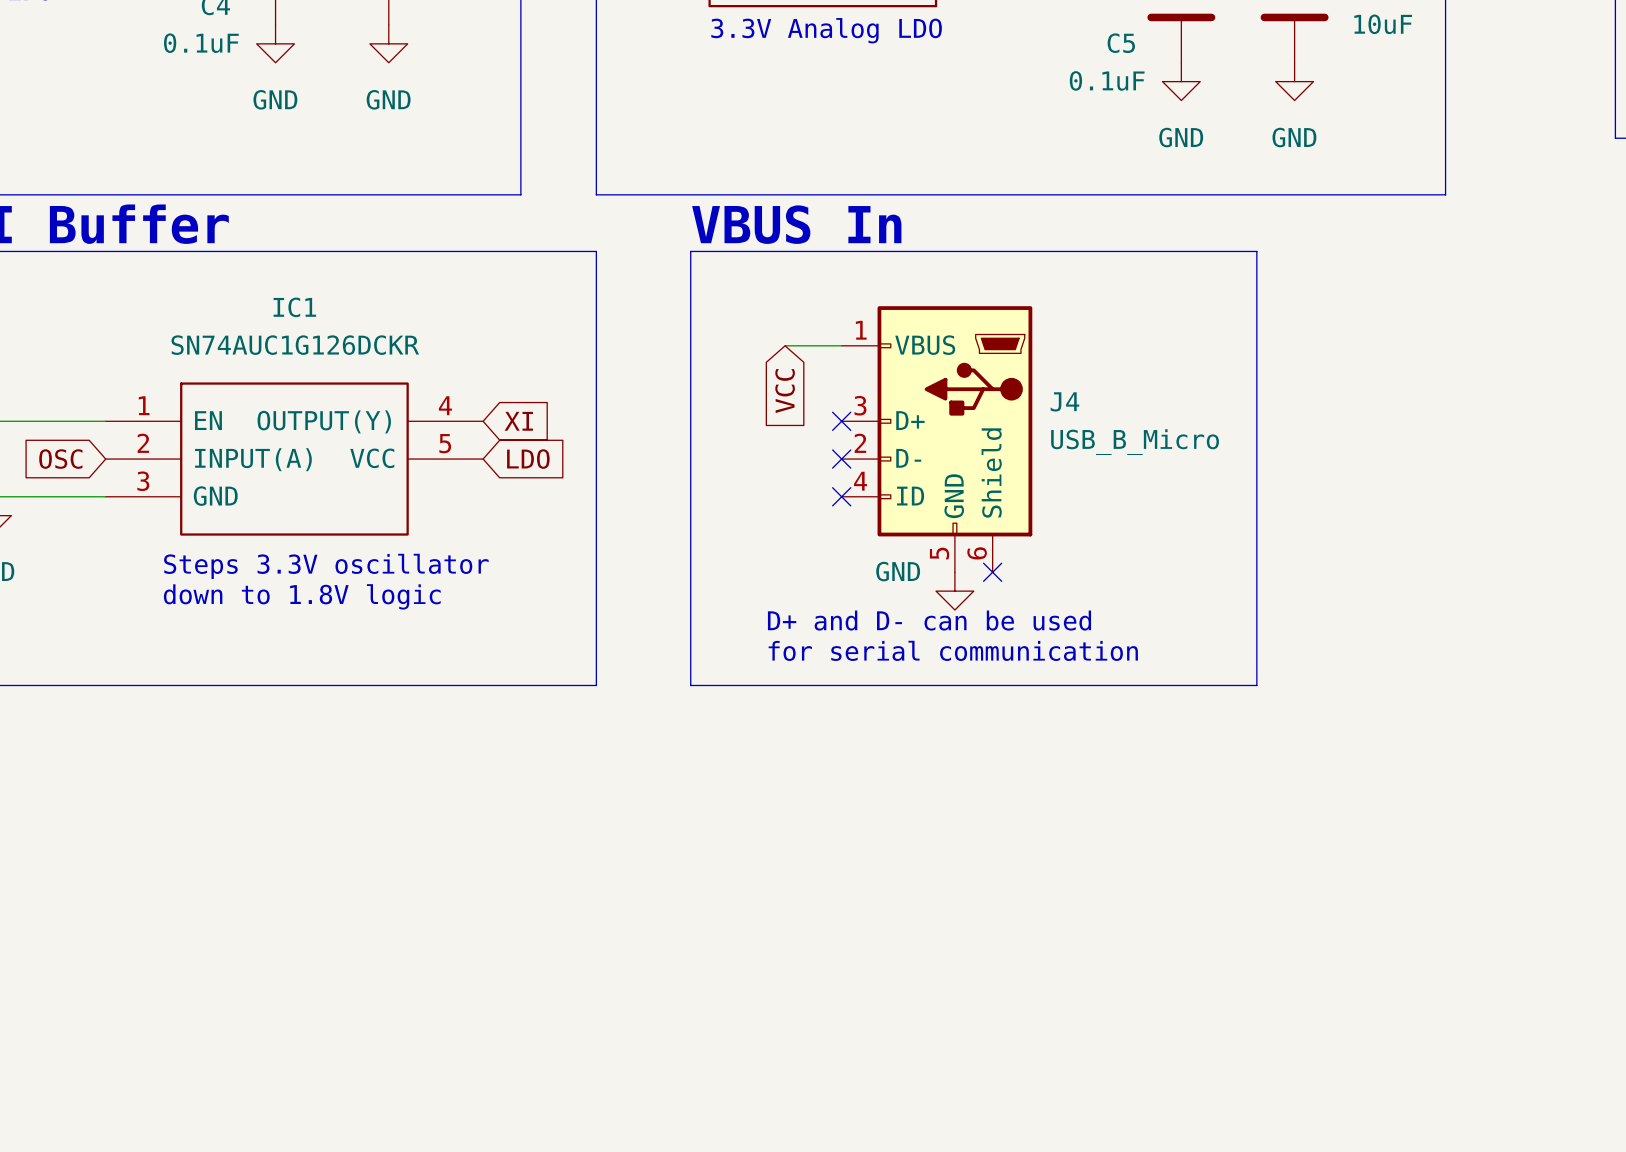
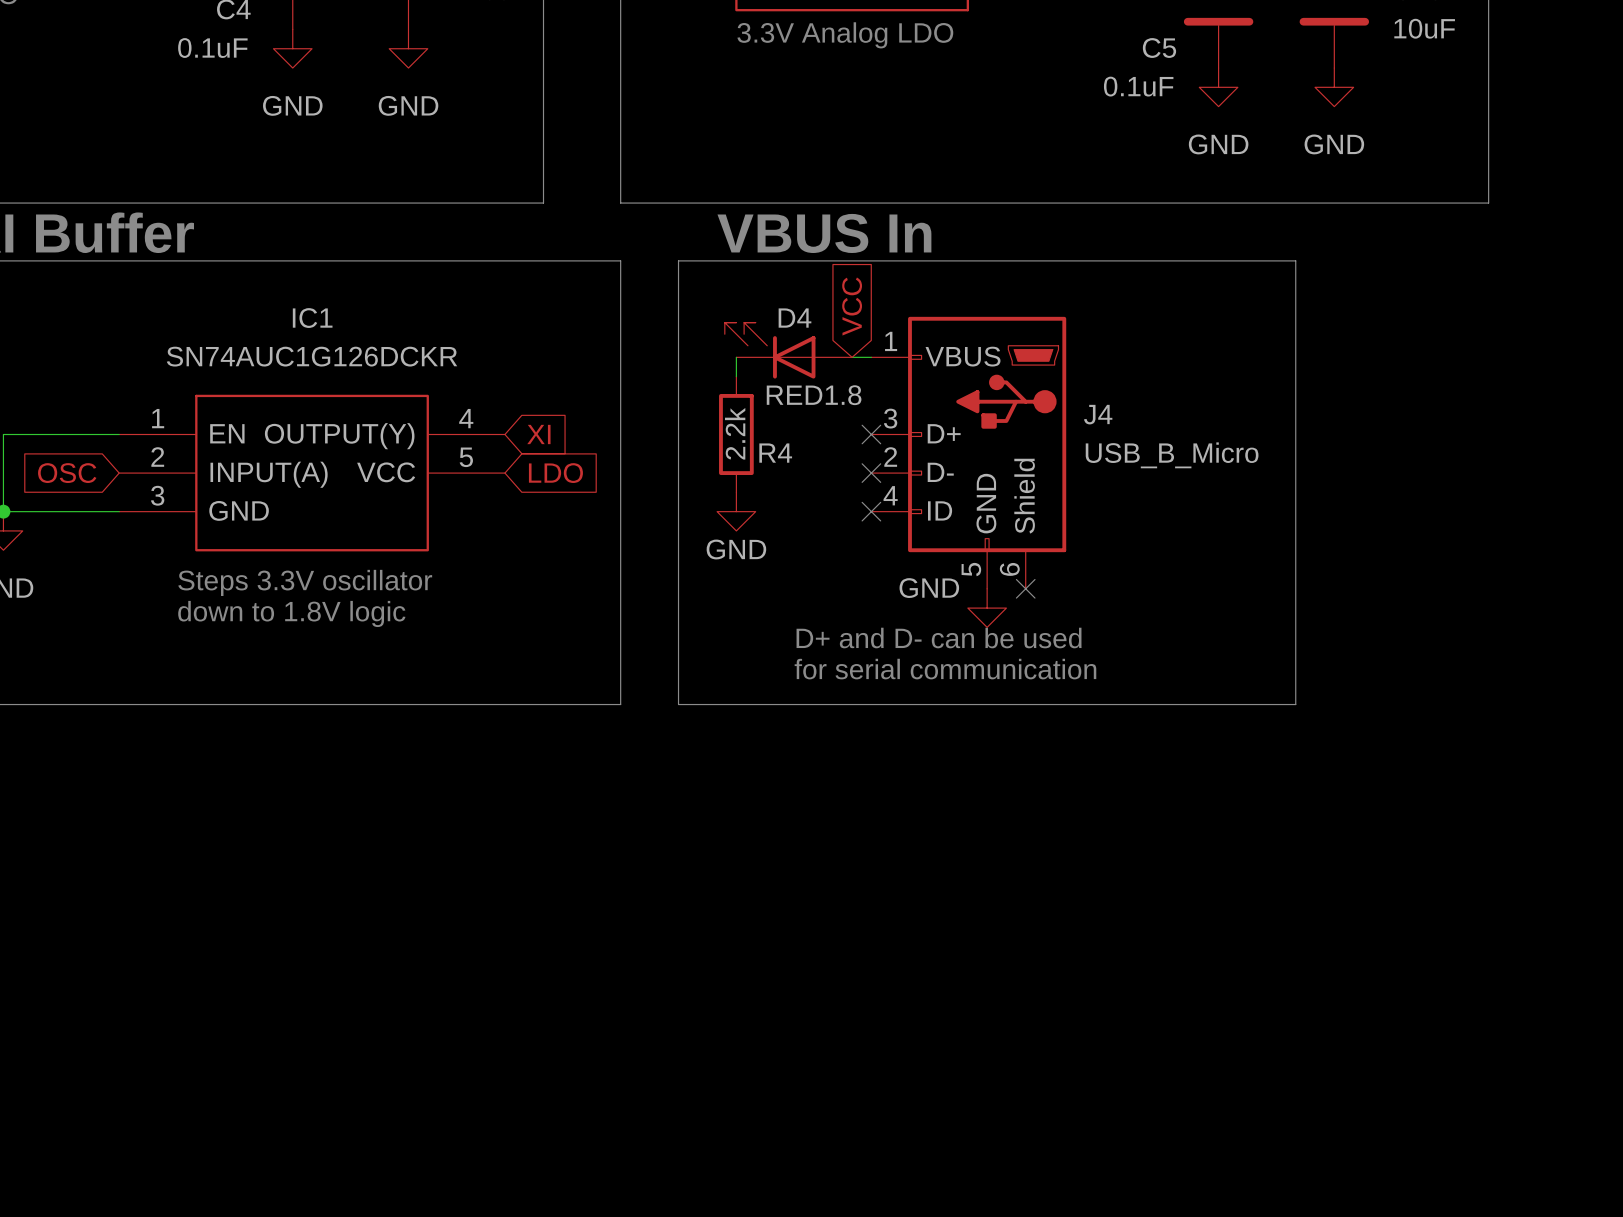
line: (690, 251) (690, 685) -> (717, 260) (678, 260) (678, 704) (717, 704)
D4: none -> RED1.8 (788, 350)
wire: none -> (736, 357) (736, 376)
global label rotation: 0° (785, 391) -> 180° (852, 306)
global label position: VCC (785, 391) -> VCC (852, 306)
R4: none -> 2.2k (736, 434)
power symbol: none -> GND (736, 511)

